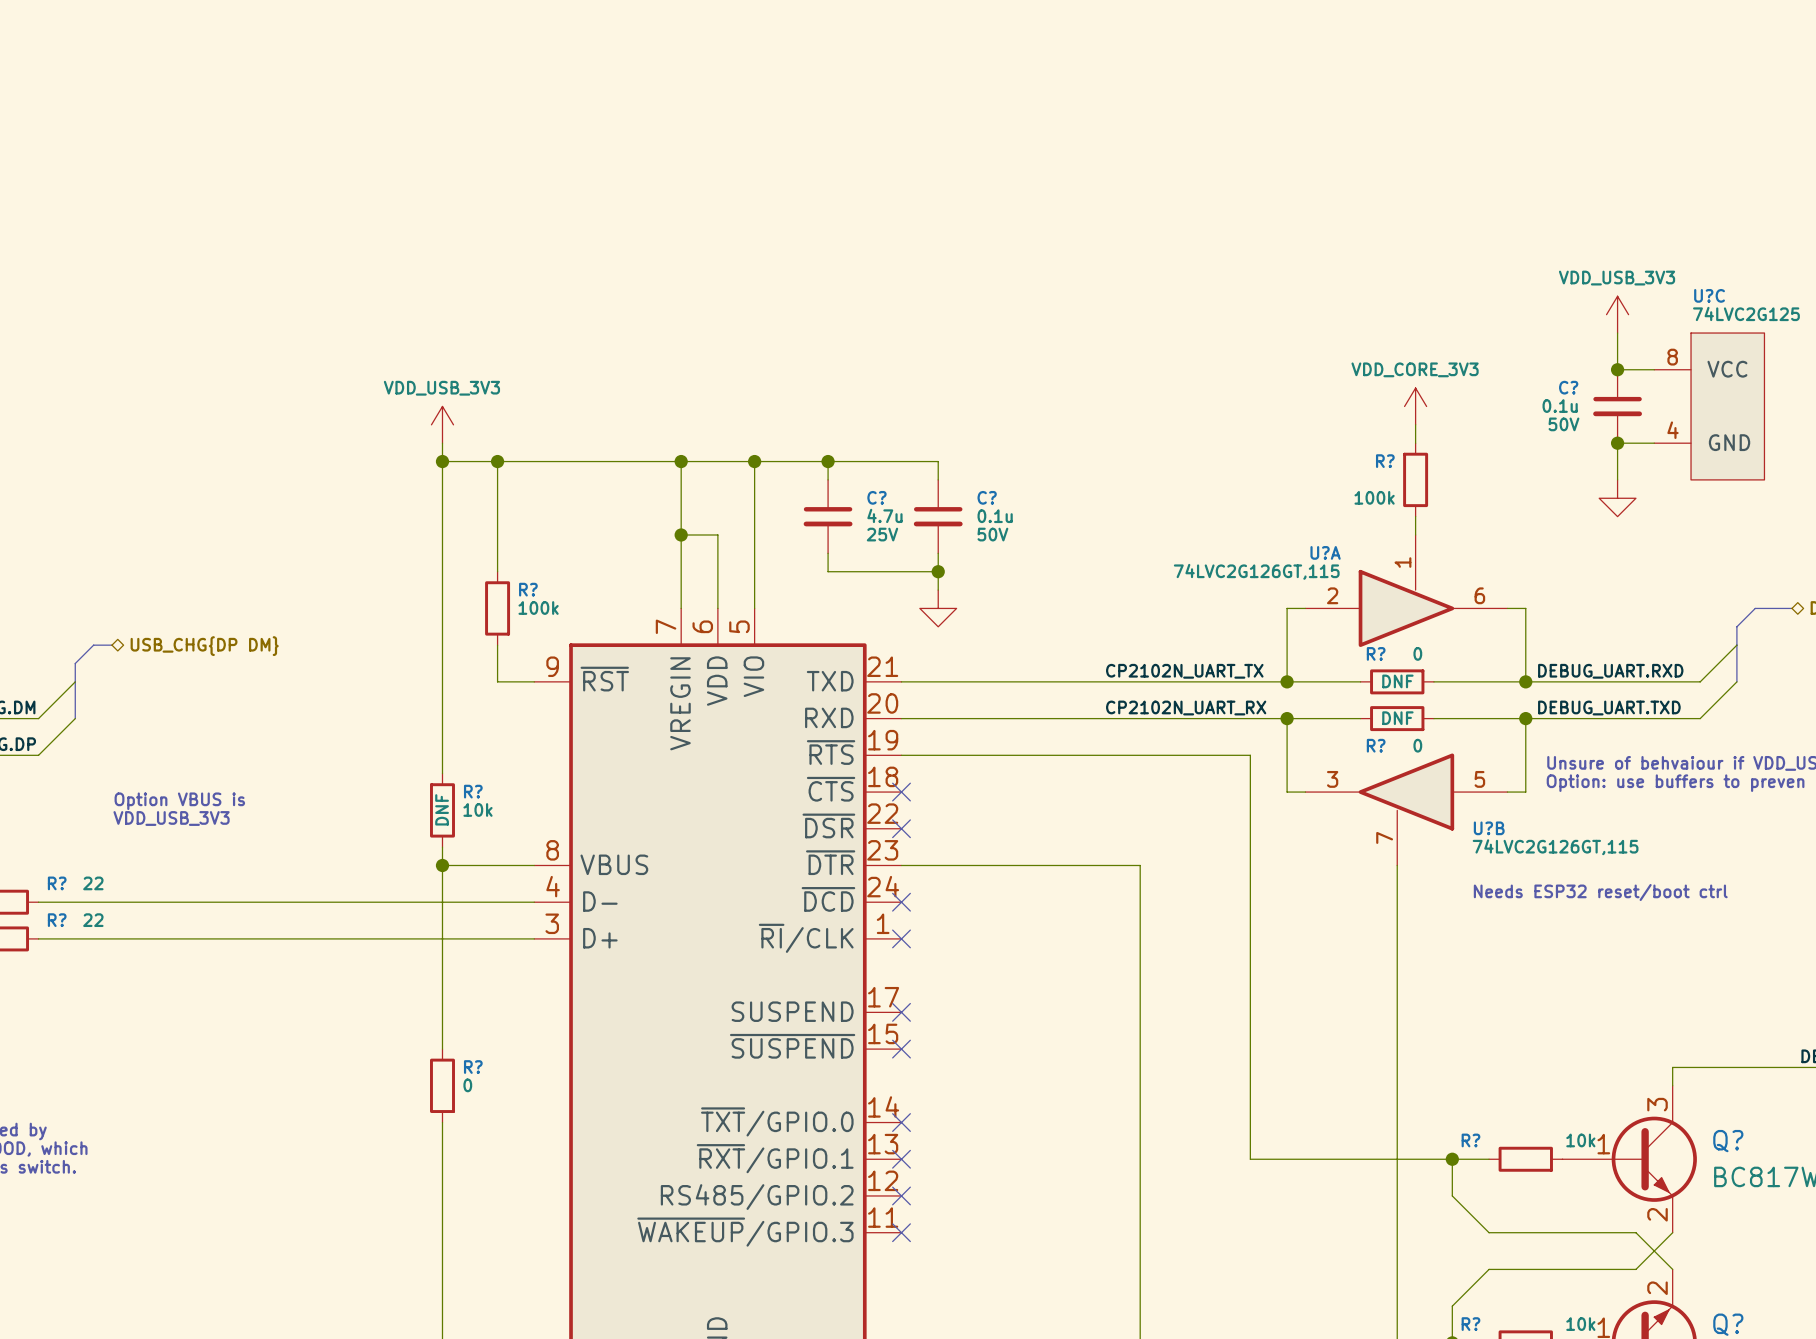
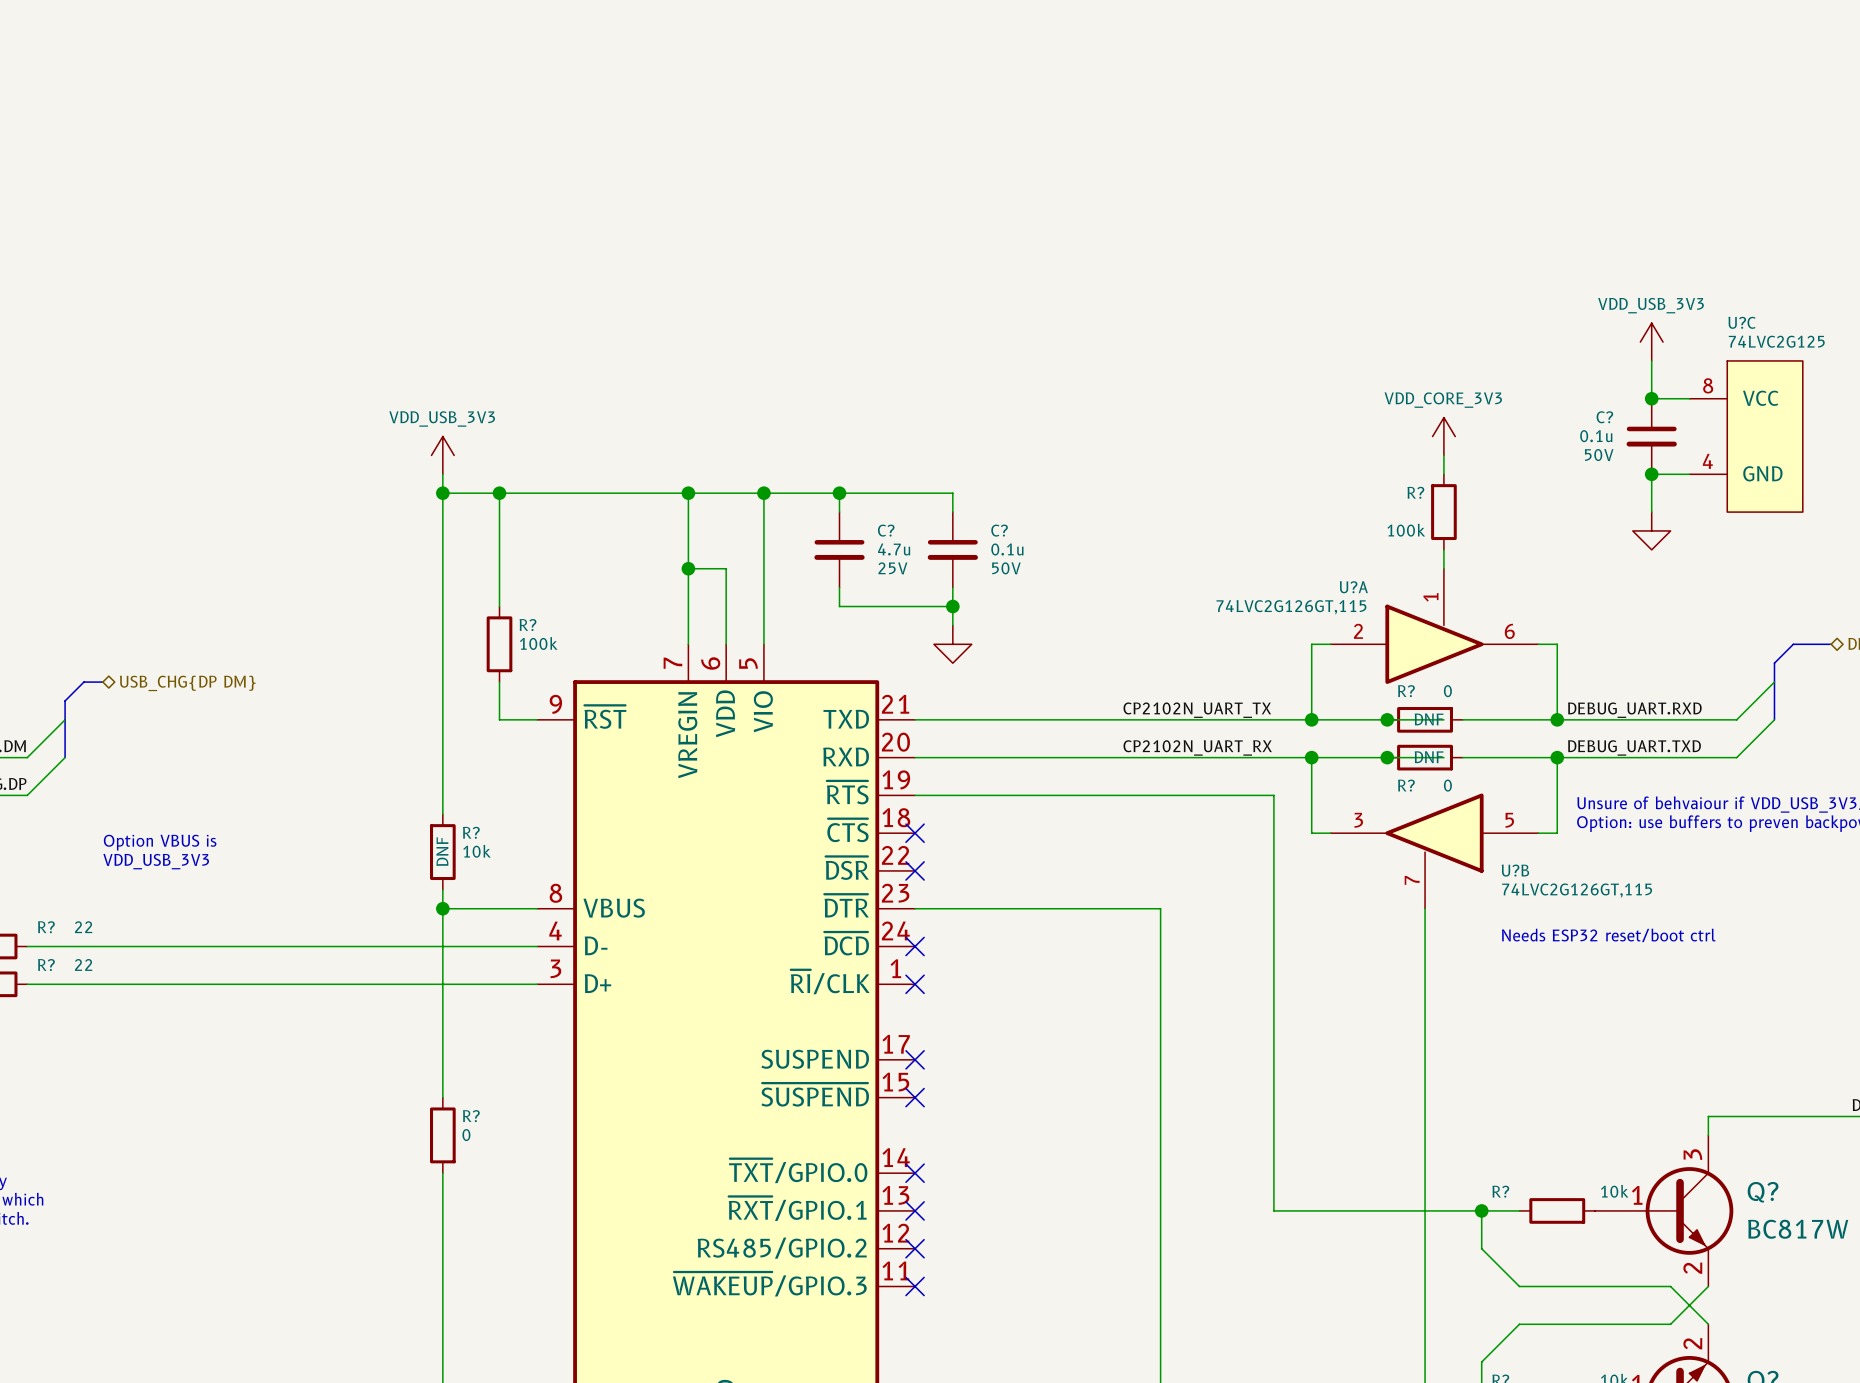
wire: none -> (1387, 719) (1443, 719)
junction: none -> (1387, 719)
wire: none -> (1387, 757) (1443, 757)
junction: none -> (1387, 757)

